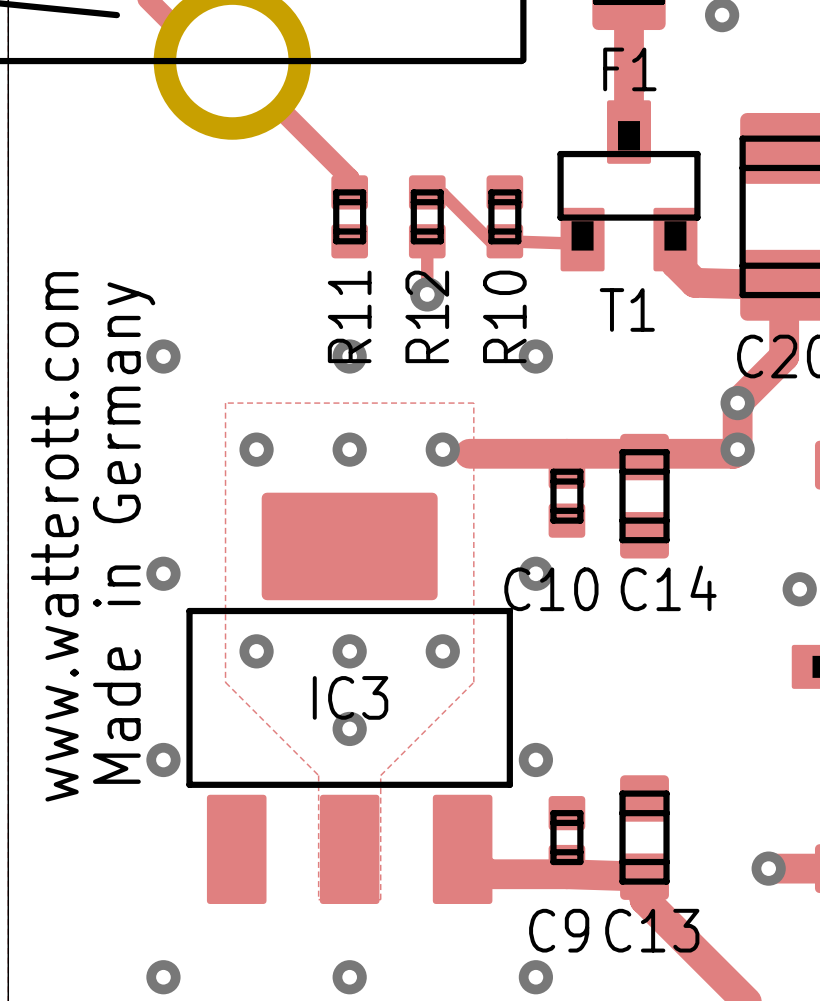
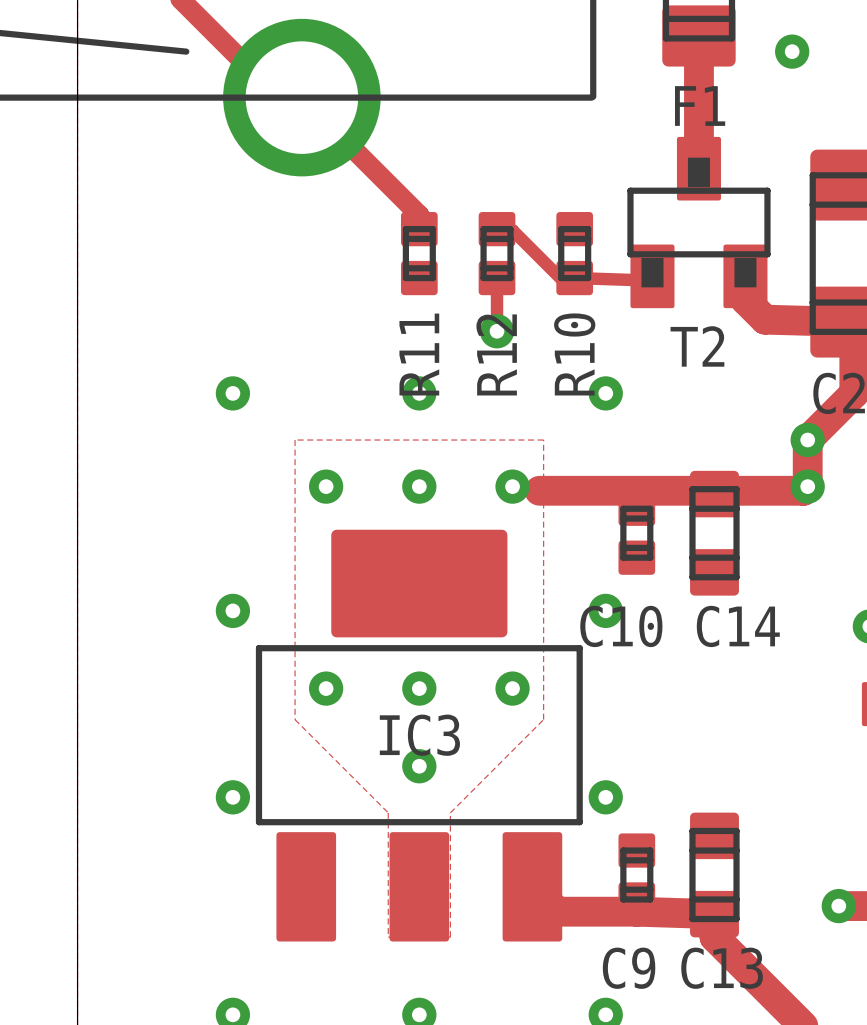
T1 name: T1 (627, 309) -> T2 (697, 346)
text: Made in Germany (124, 533) -> none
text: www.watterott.com (54, 536) -> none

